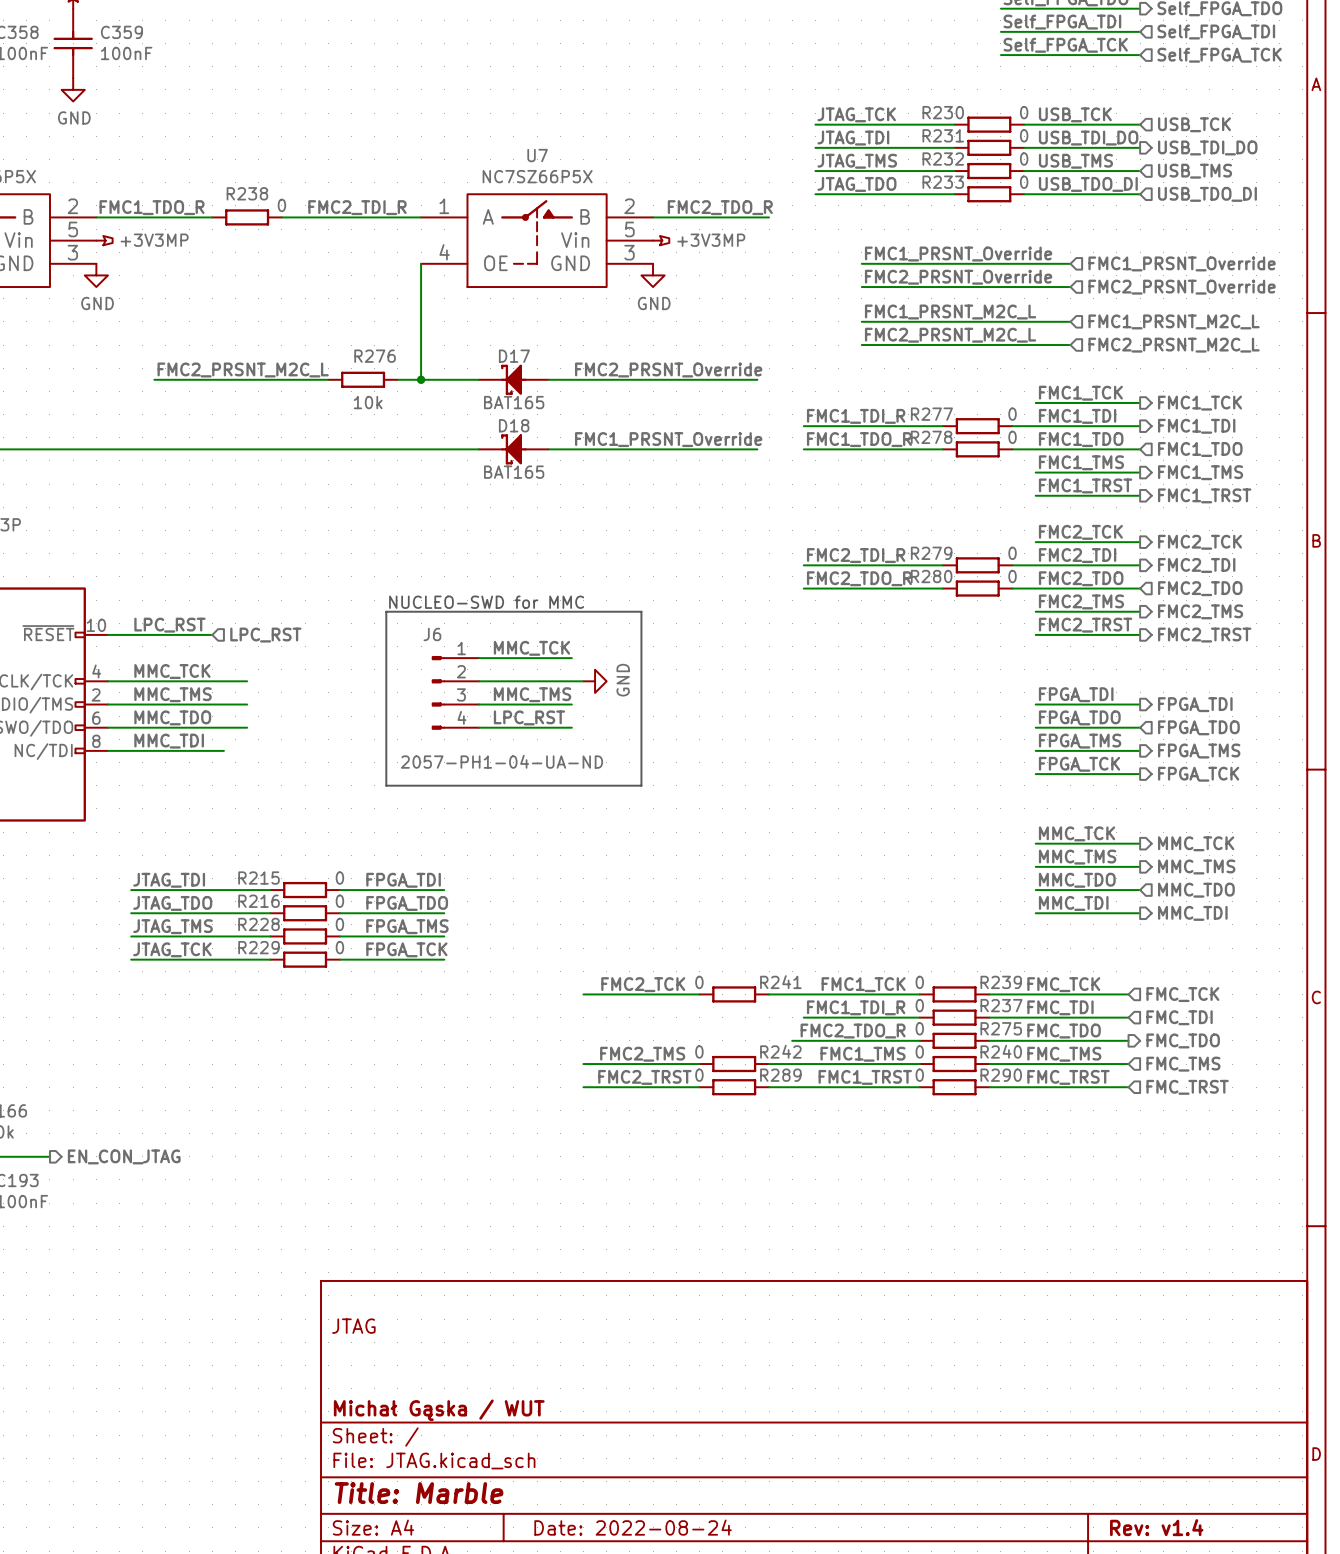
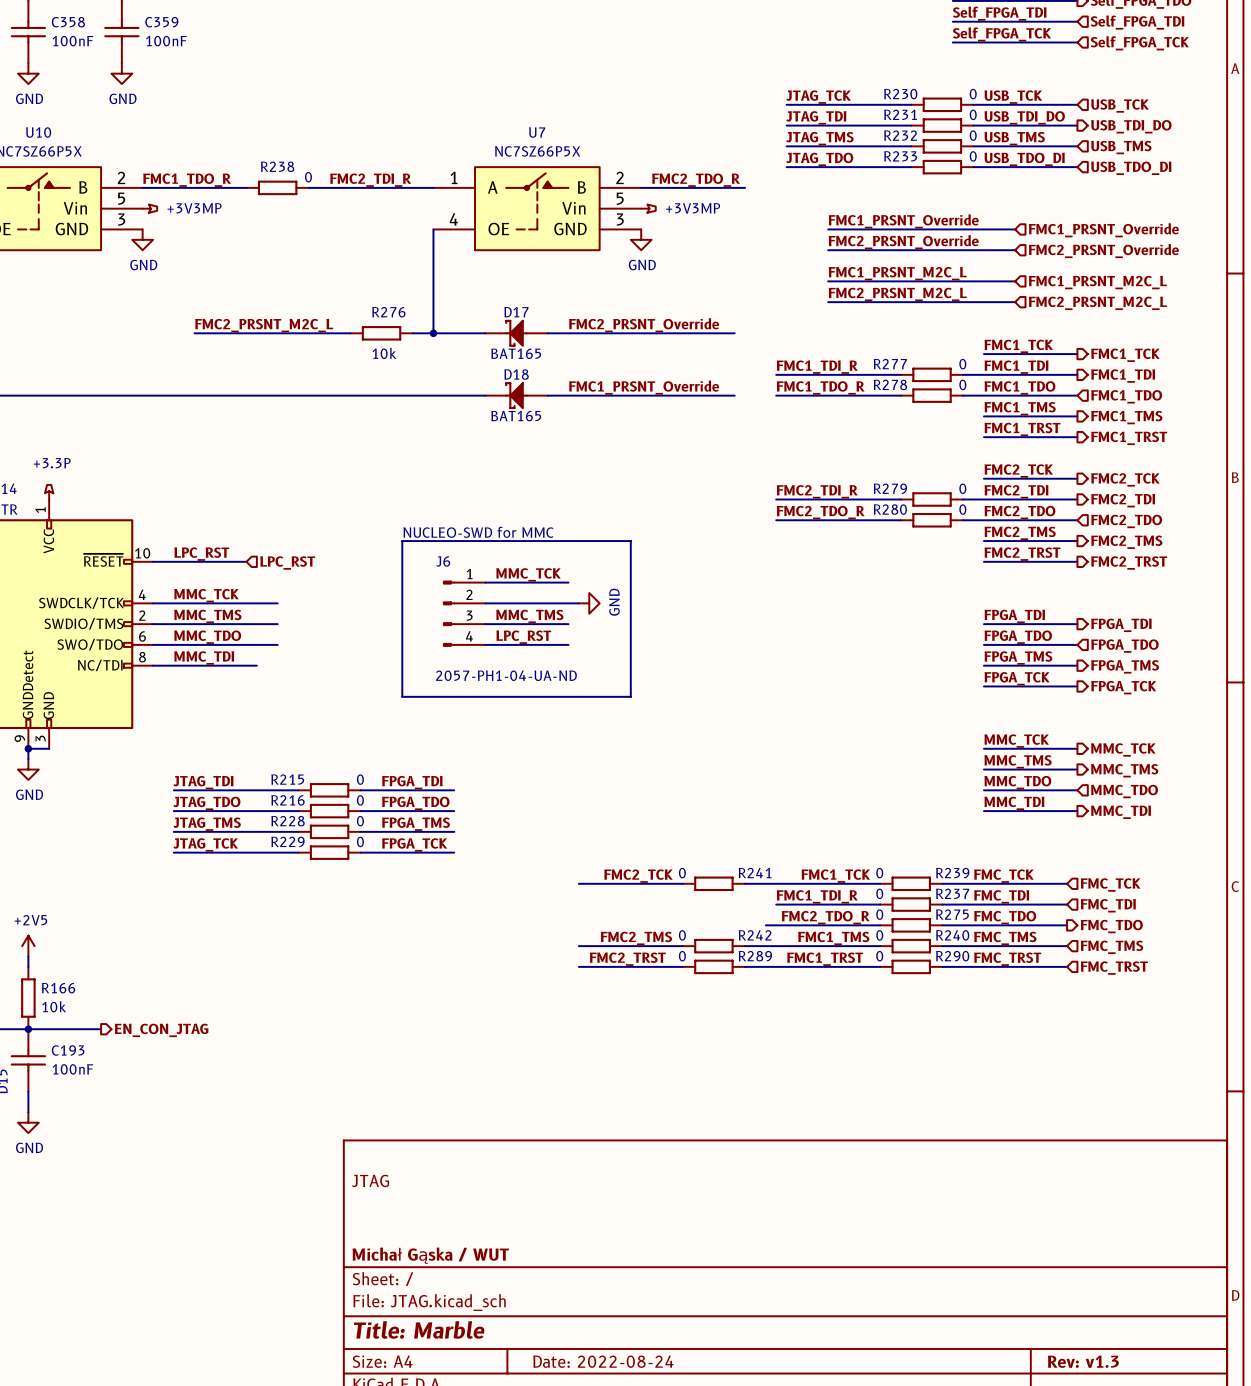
title block: Rev: v1.4 (1156, 1527) -> Rev: v1.3 (1083, 1361)

